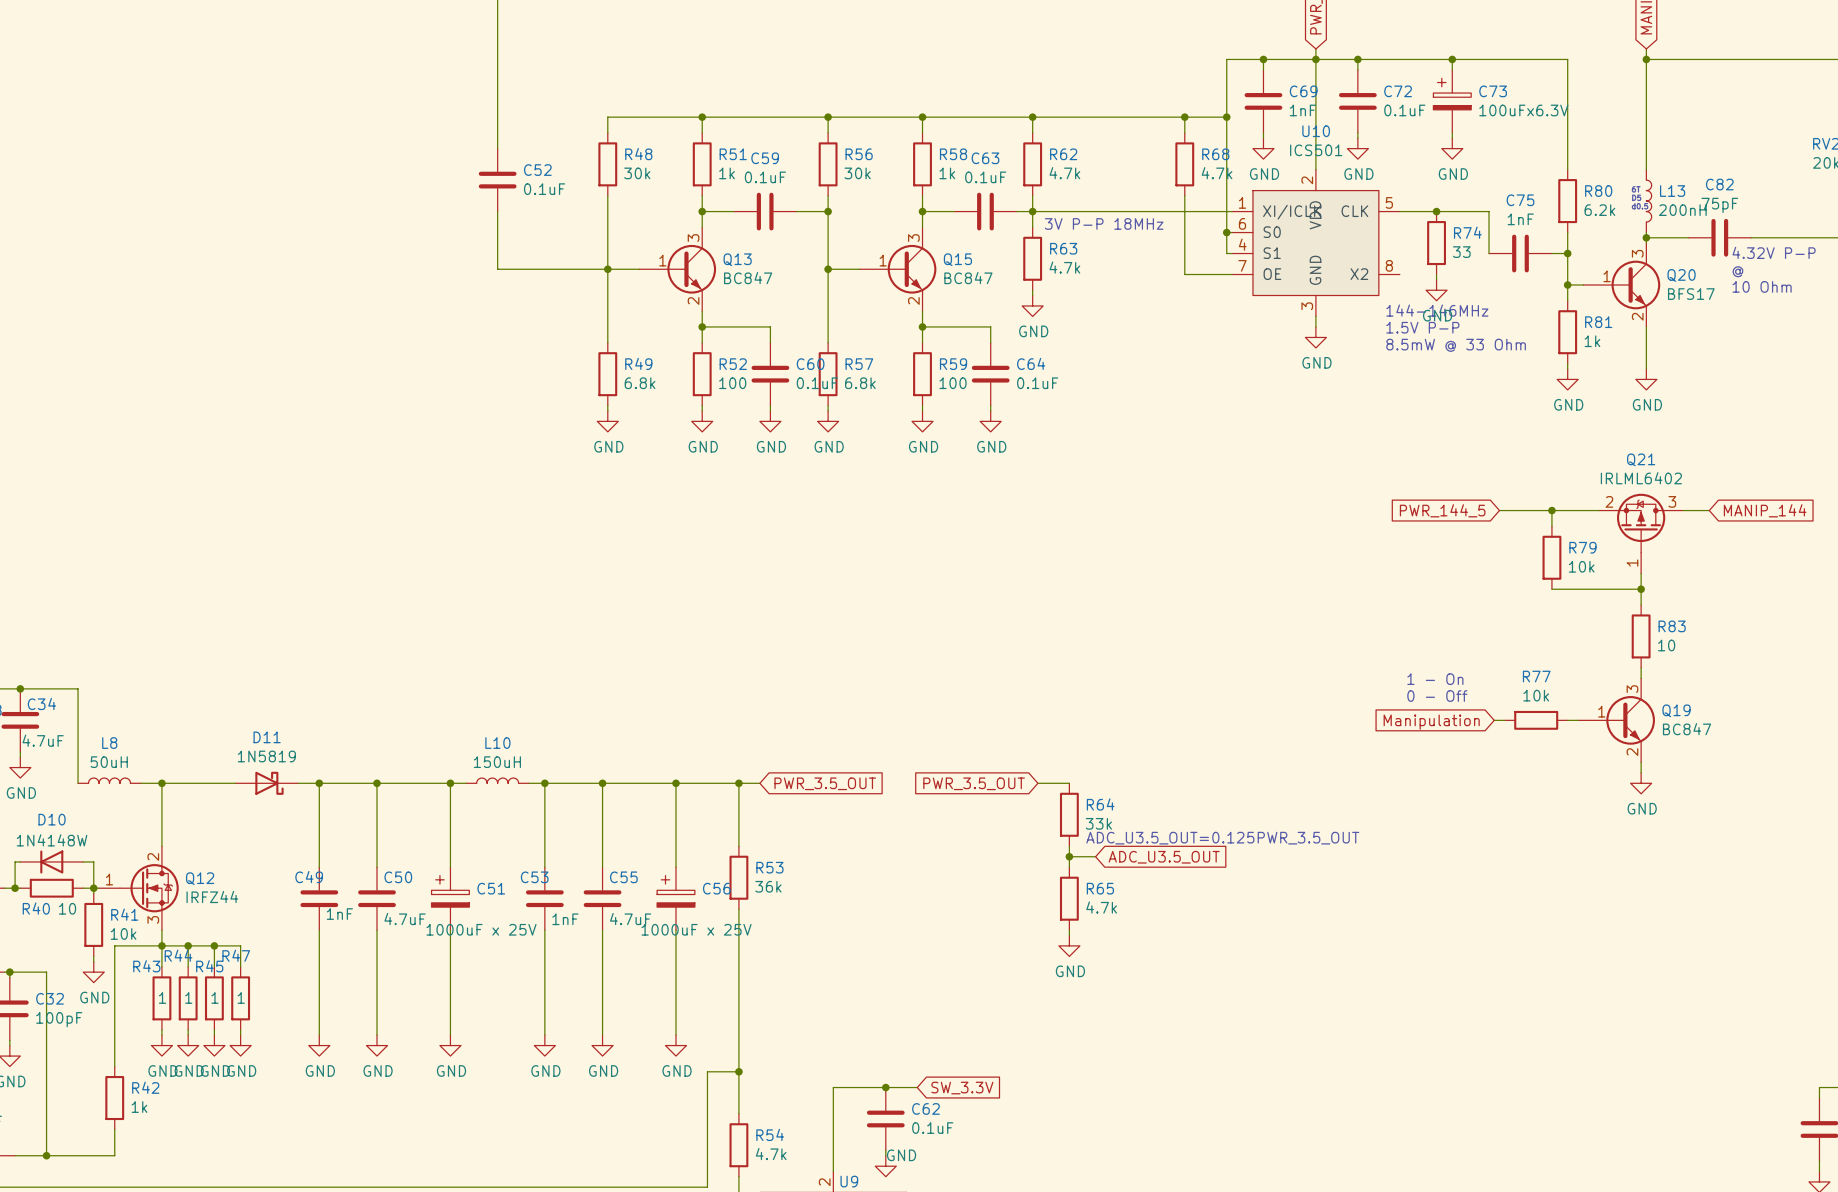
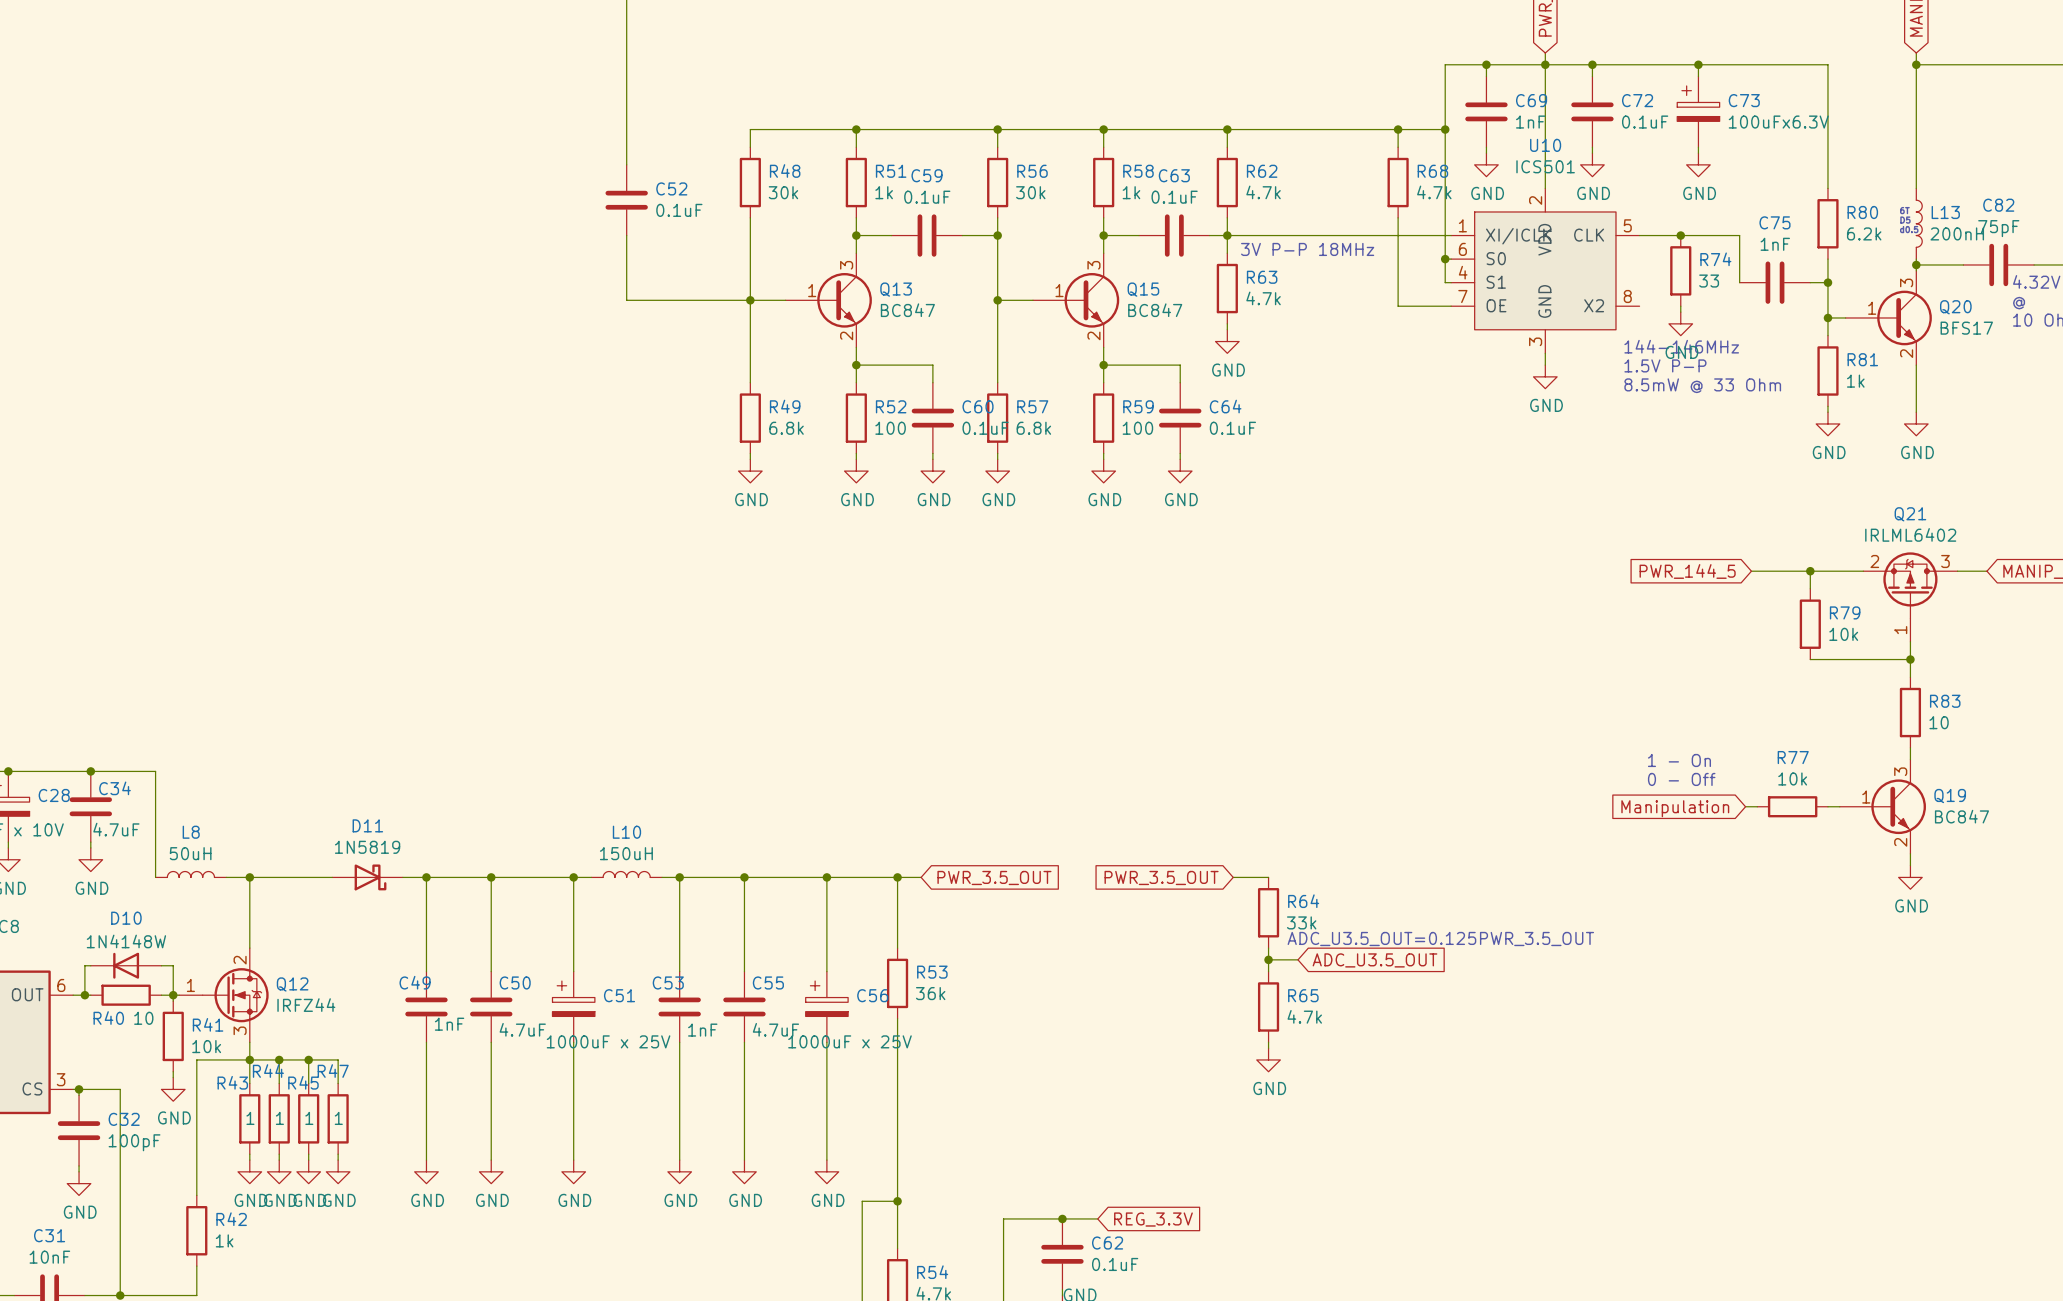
global label: SW_3.3V (962, 1088) -> REG_3.3V (1153, 1219)

